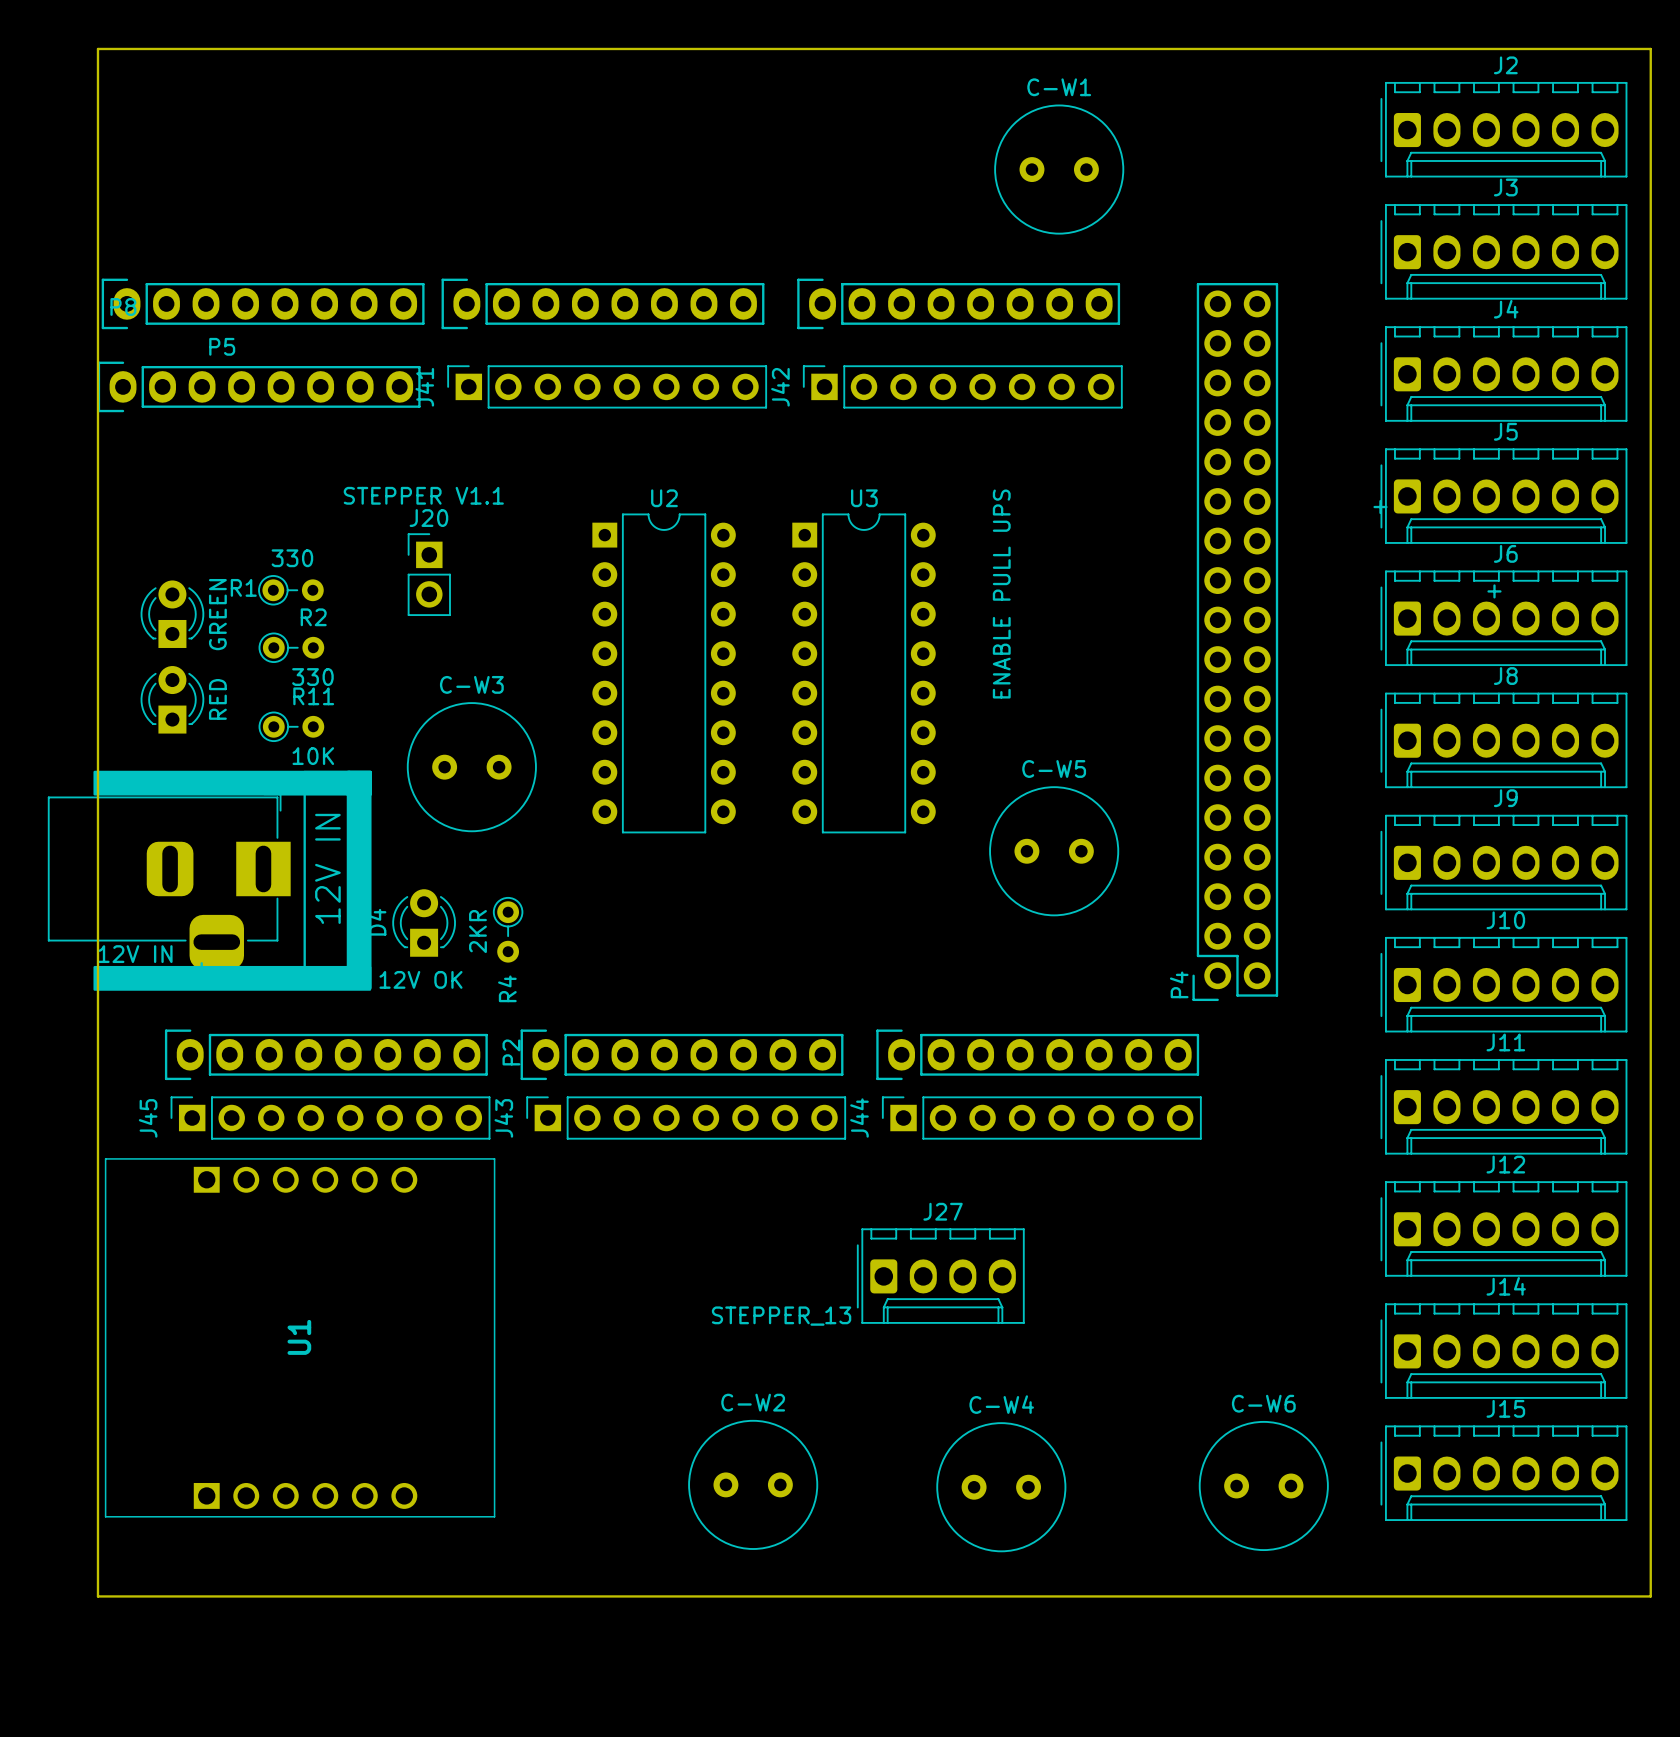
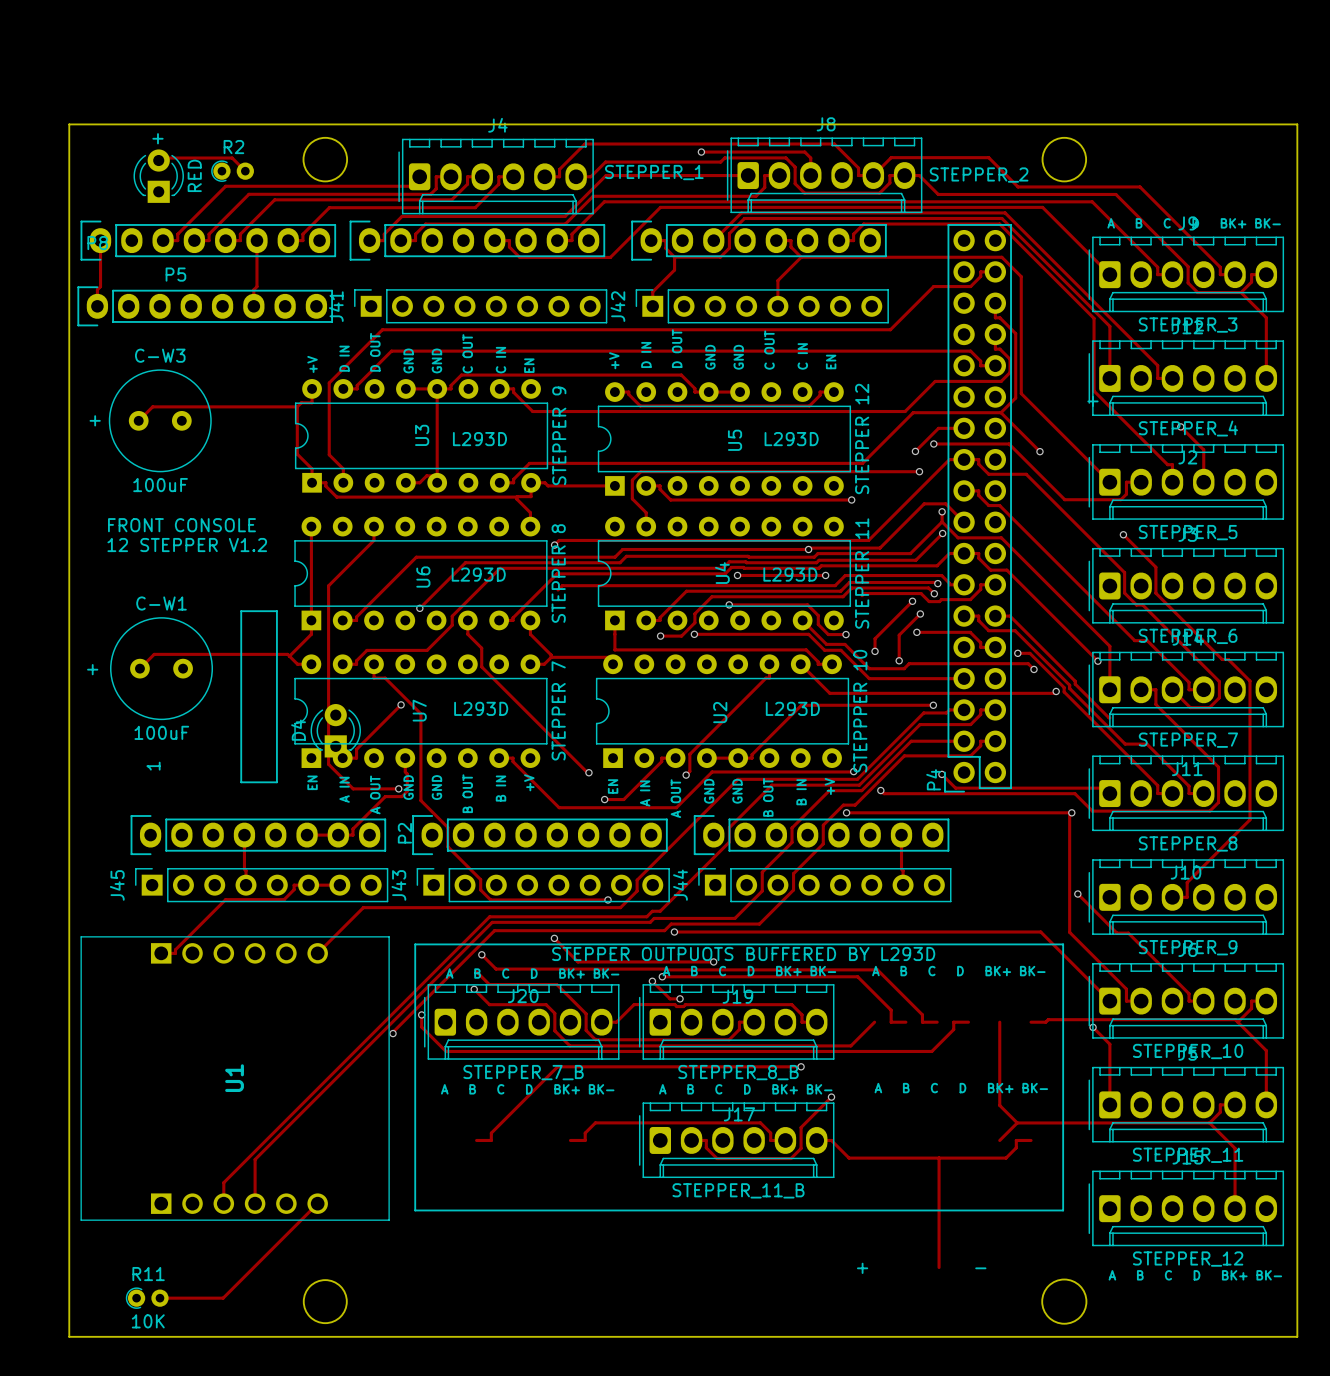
board edge: (97, 48) (1650, 48) (1650, 1596) (97, 1596) (97, 48) -> (69, 124) (69, 1336) (1297, 1336) (1297, 124) (69, 124)
J2 name position: J2 (1505, 65) -> J2 (1187, 457)
J2 position: (1503, 129) -> (1186, 481)
C-W1 position: (1059, 169) -> (161, 668)
round board edge: none -> [302, 136, 349, 183]
round board edge: none -> [1041, 136, 1088, 183]
text: none -> + (157, 138)
track: none -> (701, 152) (804, 152) (810, 158) (810, 175)
via: none -> (701, 152)
track: none -> (158, 160) (161, 158) (232, 158) (245, 171)
J4 value: none -> STEPPER_1 (654, 172)
track: none -> (748, 175) (606, 175) (565, 216) (401, 216) (384, 234) (384, 240) (369, 240)
track: none -> (779, 175) (764, 175) (764, 187) (755, 196) (593, 196) (565, 224) (425, 224) (415, 234) (415, 240) (400, 240)
J8 value: none -> STEPPER_2 (979, 175)
part: none -> RED (158, 176)
track: none -> (419, 176) (410, 186) (225, 186) (177, 234) (177, 240) (163, 240)
track: none -> (450, 176) (436, 176) (436, 188) (430, 194) (248, 194) (209, 234) (209, 240) (194, 240)
track: none -> (482, 176) (467, 176) (467, 184) (451, 199) (274, 199) (240, 234) (240, 240) (225, 240)
track: none -> (513, 176) (498, 176) (498, 184) (475, 207) (329, 207) (302, 234) (302, 240) (288, 240)
track: none -> (544, 176) (559, 176) (559, 169) (584, 144) (834, 144) (858, 168) (858, 175) (873, 175) (891, 157) (988, 157) (1018, 186) (1139, 186) (1220, 267) (1220, 274) (1235, 274)
track: none -> (576, 176) (590, 176) (605, 162) (720, 162) (724, 157) (785, 157) (795, 167) (795, 183) (804, 193) (879, 193) (889, 182) (889, 175) (919, 175) (938, 194) (1115, 194) (1188, 266) (1188, 282) (1197, 292) (1241, 292)
J3 position: (1503, 251) -> (1186, 585)
text: none -> A B C D BK+ BK- (1194, 223)
track: none -> (100, 240) (100, 286) (97, 289) (97, 306)
track: none -> (256, 240) (256, 286) (253, 289) (253, 306)
track: none -> (494, 240) (509, 240) (509, 247) (519, 257) (610, 257) (660, 207) (1042, 207) (1109, 274)
track: none -> (557, 240) (571, 240) (571, 234) (604, 201) (1092, 201) (1157, 267) (1157, 274) (1172, 274)
track: none -> (651, 240) (665, 240) (665, 248) (674, 257)
track: none -> (713, 240) (741, 212) (1005, 212) (1157, 365) (1157, 378) (1172, 378)
track: none -> (776, 240) (791, 240) (791, 247) (801, 257)
track: none -> (838, 240) (853, 240) (853, 234) (863, 224) (999, 224) (1094, 318) (1094, 391) (1167, 464) (1172, 464) (1172, 482)
track: none -> (674, 257) (720, 257) (729, 248) (729, 233) (744, 218) (1001, 218) (1109, 326) (1109, 378)
track: none -> (674, 257) (674, 270) (652, 291) (652, 306)
track: none -> (801, 257) (1001, 257) (1021, 276) (1021, 393) (1109, 482)
track: none -> (801, 257) (777, 280) (777, 306)
track: none -> (995, 271) (980, 271) (980, 276) (970, 286) (933, 286) (890, 329) (382, 329) (329, 382) (329, 454) (343, 468) (343, 482)
track: none -> (1266, 274) (1251, 274) (1251, 282) (1241, 292)
track: none -> (1241, 292) (1266, 317) (1266, 378)
J4 position: (1503, 373) -> (496, 176)
track: none -> (995, 303) (995, 317) (999, 317) (1015, 333) (1015, 398) (1001, 412)
J9 value: none -> STEPPER_3 (1188, 325)
track: none -> (995, 334) (995, 349) (999, 349) (1010, 359) (1010, 372) (1001, 381) (935, 381) (905, 411) (532, 411) (513, 392) (513, 388) (499, 388)
text: none -> D OUT (677, 348)
text: none -> C OUT (769, 350)
text: none -> D OUT (375, 352)
text: none -> C OUT (467, 353)
text: none -> D IN (646, 354)
text: none -> C IN (802, 356)
text: none -> GND (710, 357)
text: none -> GND (738, 357)
text: none -> D IN (344, 358)
text: none -> C IN (501, 360)
text: none -> GND (408, 360)
text: none -> GND (436, 360)
text: none -> +V (614, 360)
text: none -> EN (831, 361)
text: none -> +V (312, 364)
text: none -> EN (529, 365)
track: none -> (995, 365) (980, 365) (980, 361) (970, 351) (391, 351) (357, 385) (357, 388) (343, 388)
track: none -> (312, 388) (312, 402) (301, 402) (297, 406)
track: none -> (405, 388) (451, 388) (451, 385) (461, 375) (681, 375) (694, 388) (694, 392) (740, 392)
track: none -> (437, 388) (437, 482)
text: STEPPER V1.1 (423, 495) -> none
track: none -> (614, 392) (628, 392) (628, 394) (640, 405) (809, 405) (820, 395) (820, 392) (833, 392)
J5 position: (1503, 496) -> (1186, 1104)
U2 name position: U2 (664, 498) -> U2 (720, 712)
U3 name position: U3 (864, 498) -> U3 (422, 435)
track: none -> (297, 406) (152, 406) (138, 420)
track: none -> (297, 406) (297, 454) (312, 468) (312, 482) (325, 482) (325, 486) (336, 497) (516, 497)
track: none -> (1001, 412) (1039, 451)
track: none -> (1001, 412) (913, 412) (862, 463) (529, 463) (513, 479) (513, 482) (499, 482)
text: none -> + (95, 420)
J20 footprint: [407, 533, 451, 617] -> [424, 984, 620, 1060]
track: none -> (1180, 426) (1203, 449) (1203, 482)
via: none -> (1180, 426)
track: none -> (964, 428) (938, 428) (915, 451)
J12 value: none -> STEPPER_4 (1188, 428)
U3 value: none -> STEPPER 9 (559, 435)
text: none -> L293D (479, 439)
U5: none -> STEPPER 12 (724, 438)
text: none -> L293D (791, 439)
track: none -> (933, 443) (1009, 443) (1064, 499) (1120, 499) (1126, 494) (1126, 482) (1141, 482)
via: none -> (933, 443)
via: none -> (915, 451)
via: none -> (1039, 451)
R1: 330 (290, 590) -> none
text: + (1494, 591) -> none
text: ENABLE PULL UPS (1001, 594) -> none
track: none -> (919, 471) (640, 471) (632, 480) (632, 498) (646, 512) (646, 526)
via: none -> (919, 471)
track: none -> (437, 475) (426, 475) (419, 482) (405, 482)
C-W3 value: none -> 100uF (160, 485)
track: none -> (614, 485) (548, 485) (544, 482) (531, 482) (531, 496) (516, 497)
track: none -> (646, 485) (660, 485) (660, 489) (670, 500) (851, 500)
part: GREEN (172, 614) -> none
J6 position: (1503, 618) -> (1186, 1000)
track: none -> (964, 490) (978, 490) (978, 495) (988, 505) (999, 505) (1134, 640) (1147, 640) (1189, 682) (1189, 689) (1203, 689)
track: none -> (516, 497) (530, 512) (530, 526)
via: none -> (851, 500)
R2 footprint: [258, 632, 325, 664] -> [211, 160, 254, 182]
track: none -> (942, 511) (942, 521)
via: none -> (942, 511)
track: none -> (942, 521) (910, 553) (817, 553) (814, 557) (626, 556) (620, 562) (465, 562) (419, 608)
track: none -> (942, 521) (958, 537) (1001, 537) (1109, 646) (1109, 689)
track: none -> (964, 522) (945, 503) (924, 503) (880, 548) (622, 549) (614, 557) (416, 557) (356, 616) (356, 620) (342, 620)
text: none -> FRONT CONSOLE (181, 525)
track: none -> (311, 526) (311, 634) (289, 656)
track: none -> (373, 526) (373, 540) (328, 585) (328, 764) (353, 788) (398, 788)
J2 value: none -> STEPPER_5 (1188, 532)
U2 rotation: 0° (664, 673) -> 90° counterclockwise (722, 711)
U2 position: (664, 673) -> (722, 711)
U3 rotation: 0° (864, 673) -> 90° counterclockwise (421, 435)
U3 position: (864, 673) -> (421, 435)
track: none -> (942, 533) (915, 560) (819, 560) (816, 562) (729, 561) (722, 568) (500, 568) (452, 616) (452, 625) (427, 650) (366, 650) (356, 660) (356, 664) (342, 664)
via: none -> (942, 533)
track: none -> (1123, 534) (1155, 567) (1155, 593) (1222, 659) (1228, 659) (1249, 681) (1249, 819) (1187, 882) (1187, 897) (1172, 897)
via: none -> (1123, 534)
R2 value: 330 (312, 677) -> none
text: none -> 12 STEPPER V1.2 (187, 545)
track: none -> (554, 545) (559, 540) (868, 540) (949, 459) (978, 459) (978, 464) (988, 474) (1026, 474) (1124, 572) (1124, 593) (1136, 605) (1142, 605) (1219, 681) (1219, 697) (1209, 707) (1190, 707) (1172, 689)
via: none -> (554, 545)
via: none -> (808, 549)
part: RED (172, 699) -> none
R11 footprint: [258, 711, 325, 743] -> [125, 1287, 169, 1309]
U6: none -> STEPPER 8 (420, 573)
U4: none -> STEPPER 11 (724, 573)
text: none -> L293D (478, 574)
text: none -> L293D (790, 574)
track: none -> (737, 575) (825, 575)
via: none -> (737, 575)
via: none -> (825, 575)
track: none -> (937, 583) (849, 582) (840, 591) (686, 591) (660, 617) (660, 620) (646, 620)
via: none -> (937, 583)
track: none -> (964, 584) (949, 584) (941, 575) (845, 575) (835, 585) (562, 585) (558, 590)
track: none -> (995, 584) (980, 584) (980, 589) (970, 599) (929, 601) (921, 593) (864, 593) (862, 595)
J8 position: (1503, 740) -> (824, 175)
track: none -> (934, 593) (928, 588) (851, 588) (843, 596) (711, 596) (694, 613) (694, 622) (681, 636) (660, 636)
via: none -> (934, 593)
track: none -> (912, 601) (875, 638) (875, 651)
via: none -> (912, 601)
track: none -> (729, 604) (807, 604) (818, 615) (818, 624) (828, 634) (846, 634)
via: none -> (729, 604)
C-W3 position: (471, 767) -> (160, 420)
via: none -> (419, 608)
drawing: [93, 770, 372, 991] -> none
track: none -> (920, 613) (899, 635) (899, 660)
via: none -> (920, 613)
track: none -> (964, 616) (978, 616) (978, 620) (988, 630) (1015, 630) (1125, 744) (1146, 744) (1189, 786) (1189, 793) (1203, 793)
track: none -> (995, 616) (1010, 616) (1109, 717)
track: none -> (467, 620) (467, 634) (481, 648) (481, 666) (588, 772)
track: none -> (499, 620) (513, 620) (513, 617) (557, 573) (725, 573) (731, 567) (818, 568) (821, 565) (937, 565) (949, 553) (978, 553) (978, 558) (990, 570) (1006, 570) (1097, 661)
track: none -> (530, 620) (530, 634) (551, 657)
track: none -> (614, 620) (614, 649) (806, 649) (818, 661) (818, 664) (832, 664)
track: none -> (802, 620) (826, 644) (844, 644) (869, 668) (904, 668) (909, 663) (1028, 663) (1034, 669)
track: none -> (916, 632) (970, 632) (980, 642) (980, 647) (995, 647)
via: none -> (916, 632)
track: none -> (694, 634) (808, 634) (824, 650) (840, 650) (869, 678) (964, 678)
via: none -> (694, 634)
via: none -> (846, 634)
via: none -> (660, 636)
J3 value: none -> STEPPER_6 (1188, 636)
via: none -> (875, 651)
track: none -> (1017, 653) (1029, 653) (1064, 687) (1064, 691) (1157, 785) (1157, 793) (1172, 793)
via: none -> (1017, 653)
track: none -> (551, 657) (544, 664) (530, 664)
track: none -> (551, 657) (613, 657)
via: none -> (899, 660)
via: none -> (1097, 661)
track: none -> (311, 664) (297, 664) (287, 654) (154, 654) (139, 668)
track: none -> (373, 664) (373, 678) (385, 678) (420, 713) (420, 800) (447, 827) (447, 846) (480, 879) (480, 890) (490, 899) (608, 899)
track: none -> (769, 664) (769, 678) (766, 678) (689, 754) (689, 771) (686, 775)
track: none -> (800, 664) (829, 693) (1054, 693) (1056, 691)
text: none -> + (92, 669)
via: none -> (1034, 669)
C-W5: (1054, 851) -> none
J9 position: (1503, 862) -> (1186, 274)
text: 12V IN (327, 868) -> none
track: none -> (1141, 689) (1155, 689) (1155, 704) (1218, 767) (1218, 802) (1209, 811) (1092, 811) (1074, 793) (883, 793) (880, 790)
via: none -> (1056, 691)
part: (169, 881) -> none
track: none -> (401, 704) (356, 749) (356, 758) (342, 758)
via: none -> (401, 704)
track: none -> (933, 705) (801, 705) (752, 754) (752, 758) (706, 758)
via: none -> (933, 705)
text: none -> L293D (481, 708)
text: none -> L293D (792, 708)
track: none -> (964, 709) (949, 709) (946, 712) (923, 712) (857, 779) (737, 779) (637, 880) (637, 891) (620, 907) (363, 907) (317, 953)
track: none -> (995, 709) (980, 709) (980, 714) (970, 724) (920, 724) (859, 785) (771, 785) (729, 827) (729, 842) (660, 911) (652, 911) (646, 916) (489, 916) (223, 1182) (223, 1203)
U7: none -> STEPPER 7 (420, 711)
U2 value: none -> STEPPPER 10 (860, 711)
J10 name position: J10 (1505, 920) -> J10 (1186, 872)
C-W1 value: none -> 100uF (161, 732)
R4: (508, 929) -> none
text: 2KR (477, 931) -> none
J14 value: none -> STEPPER_7 (1188, 740)
track: none -> (964, 741) (911, 741) (861, 790) (829, 790) (792, 828) (792, 842) (762, 872) (762, 891) (734, 918) (654, 918) (650, 922) (492, 922) (255, 1159) (255, 1203)
track: none -> (995, 741) (980, 741) (980, 745) (970, 755) (904, 755) (855, 805) (843, 805) (823, 825) (823, 843) (793, 873) (793, 889) (759, 924) (671, 924) (664, 930) (494, 930) (393, 1033)
text: 12V IN (135, 954) -> none
track: none -> (405, 758) (407, 791) (401, 796) (385, 796) (352, 829) (352, 835) (307, 835)
track: none -> (499, 758) (513, 758) (513, 761) (559, 807) (676, 807) (712, 771) (853, 771)
track: none -> (675, 758) (661, 758) (661, 761) (623, 799) (604, 799)
via: none -> (853, 771)
via: none -> (588, 772)
track: none -> (941, 774) (955, 788) (1104, 788) (1109, 793)
via: none -> (941, 774)
text: 12V OK (420, 979) -> none
via: none -> (686, 775)
J10 position: (1503, 984) -> (1186, 897)
text: none -> EN (312, 782)
text: none -> +V (529, 782)
text: none -> EN (613, 786)
text: none -> +V (829, 786)
text: none -> GND (408, 787)
text: none -> GND (436, 787)
via: none -> (398, 788)
text: none -> B IN (501, 788)
text: none -> A IN (344, 789)
via: none -> (880, 790)
text: none -> GND (709, 791)
text: none -> GND (737, 791)
text: none -> B IN (801, 792)
text: none -> B OUT (467, 793)
text: none -> A IN (645, 793)
text: none -> A OUT (375, 794)
text: none -> B OUT (768, 797)
text: none -> A OUT (675, 798)
via: none -> (604, 799)
track: none -> (846, 812) (1071, 812)
via: none -> (846, 812)
track: none -> (1069, 812) (1069, 932) (1126, 989) (1126, 1001) (1141, 1001)
via: none -> (1071, 812)
J11 name position: J11 (1505, 1042) -> J11 (1187, 769)
track: none -> (244, 835) (246, 885)
track: none -> (901, 835) (903, 885)
J11 value: none -> STEPPER_8 (1188, 843)
J11 position: (1503, 1106) -> (1186, 793)
track: none -> (339, 885) (294, 885) (294, 889) (284, 899) (225, 899) (175, 949) (175, 953) (161, 953)
track: none -> (1077, 894) (1116, 933) (1128, 933) (1189, 993) (1189, 1001) (1203, 1001)
via: none -> (1077, 894)
via: none -> (608, 899)
track: none -> (674, 932) (1040, 932) (1109, 1001)
via: none -> (674, 932)
track: none -> (554, 938) (578, 961) (713, 961)
via: none -> (554, 938)
line: none -> (415, 944) (1063, 944) (1063, 1210) (415, 1210) (415, 944)
J10 value: none -> STEPPER_9 (1188, 947)
text: none -> STEPPER OUTPUOTS BUFFERED BY L293D (743, 953)
track: none -> (481, 954) (496, 969) (877, 969) (922, 1014) (922, 1022) (937, 1022)
via: none -> (481, 954)
via: none -> (713, 961)
text: none -> A B C D BK+ BK- (749, 971)
text: none -> A B C D BK+ BK- (958, 971)
track: none -> (476, 971) (489, 984) (556, 984) (586, 1013) (586, 1030) (595, 1039) (729, 1039) (739, 1029) (739, 1022) (754, 1022)
J12 position: (1503, 1228) -> (1186, 378)
text: none -> A B C D BK+ BK- (532, 973)
track: none -> (662, 976) (857, 976) (891, 1010) (891, 1022) (905, 1022)
via: none -> (662, 976)
track: none -> (652, 981) (669, 998) (680, 998)
via: none -> (652, 981)
track: none -> (474, 989) (489, 1004) (546, 1004) (554, 1013) (554, 1030) (569, 1045) (850, 1045) (874, 1022)
via: none -> (474, 989)
via: none -> (680, 998)
track: none -> (1266, 1001) (1251, 1001) (1251, 1008) (1237, 1022)
J27: STEPPER_13 (940, 1276) -> none
track: none -> (421, 1014) (421, 1027) (446, 1051) (931, 1051) (953, 1029) (953, 1022) (968, 1022)
via: none -> (421, 1014)
J19: none -> STEPPER_8_B (736, 1021)
track: none -> (601, 1022) (616, 1022) (634, 1004) (674, 1004) (676, 1006) (685, 1004) (791, 1004) (801, 1014) (801, 1022) (816, 1022)
track: none -> (999, 1022) (999, 1105) (1017, 1122)
track: none -> (1031, 1022) (1045, 1022) (1048, 1019) (1235, 1019) (1266, 1050) (1266, 1104)
track: none -> (1093, 1027) (1109, 1044) (1109, 1104)
via: none -> (1093, 1027)
via: none -> (393, 1033)
J6 value: none -> STEPPER_10 (1188, 1051)
U1 position: (300, 1337) -> (235, 1078)
track: none -> (801, 1066) (557, 1066) (491, 1133) (491, 1140) (476, 1140)
via: none -> (801, 1066)
J14 position: (1503, 1351) -> (1186, 689)
J20 value: none -> STEPPER_7_B (523, 1072)
text: none -> A B C D BK+ BK- (961, 1088)
text: none -> A B C D BK+ BK- (527, 1089)
text: none -> A B C D BK+ BK- (745, 1089)
track: none -> (831, 1097) (801, 1127) (801, 1148) (791, 1158) (717, 1158) (706, 1147) (706, 1140) (691, 1140)
via: none -> (831, 1097)
track: none -> (1235, 1104) (1220, 1104) (1220, 1112) (1209, 1122)
track: none -> (1017, 1122) (1209, 1122)
track: none -> (1017, 1122) (999, 1140)
track: none -> (1209, 1122) (1235, 1148) (1235, 1208)
track: none -> (570, 1140) (585, 1140) (585, 1133) (595, 1122) (760, 1122) (770, 1133) (770, 1140) (785, 1140)
J17: none -> STEPPER_11_B (736, 1140)
track: none -> (816, 1140) (831, 1140) (849, 1158) (1006, 1158) (1016, 1147) (1016, 1140) (1031, 1140)
J5 value: none -> STEPPER_11 (1188, 1155)
track: none -> (939, 1158) (939, 1267)
J15 position: (1503, 1473) -> (1186, 1208)
C-W2: (753, 1484) -> none
C-W6: (1263, 1485) -> none
C-W4: (1001, 1487) -> none
track: none -> (317, 1203) (223, 1298) (159, 1298)
J15 value: none -> STEPPER_12 (1188, 1259)
text: none -> + (862, 1268)
text: none -> - (980, 1268)
text: none -> A B C D BK+ BK- (1195, 1275)
round board edge: none -> [1041, 1278, 1088, 1325]
round board edge: none -> [302, 1279, 348, 1325]

